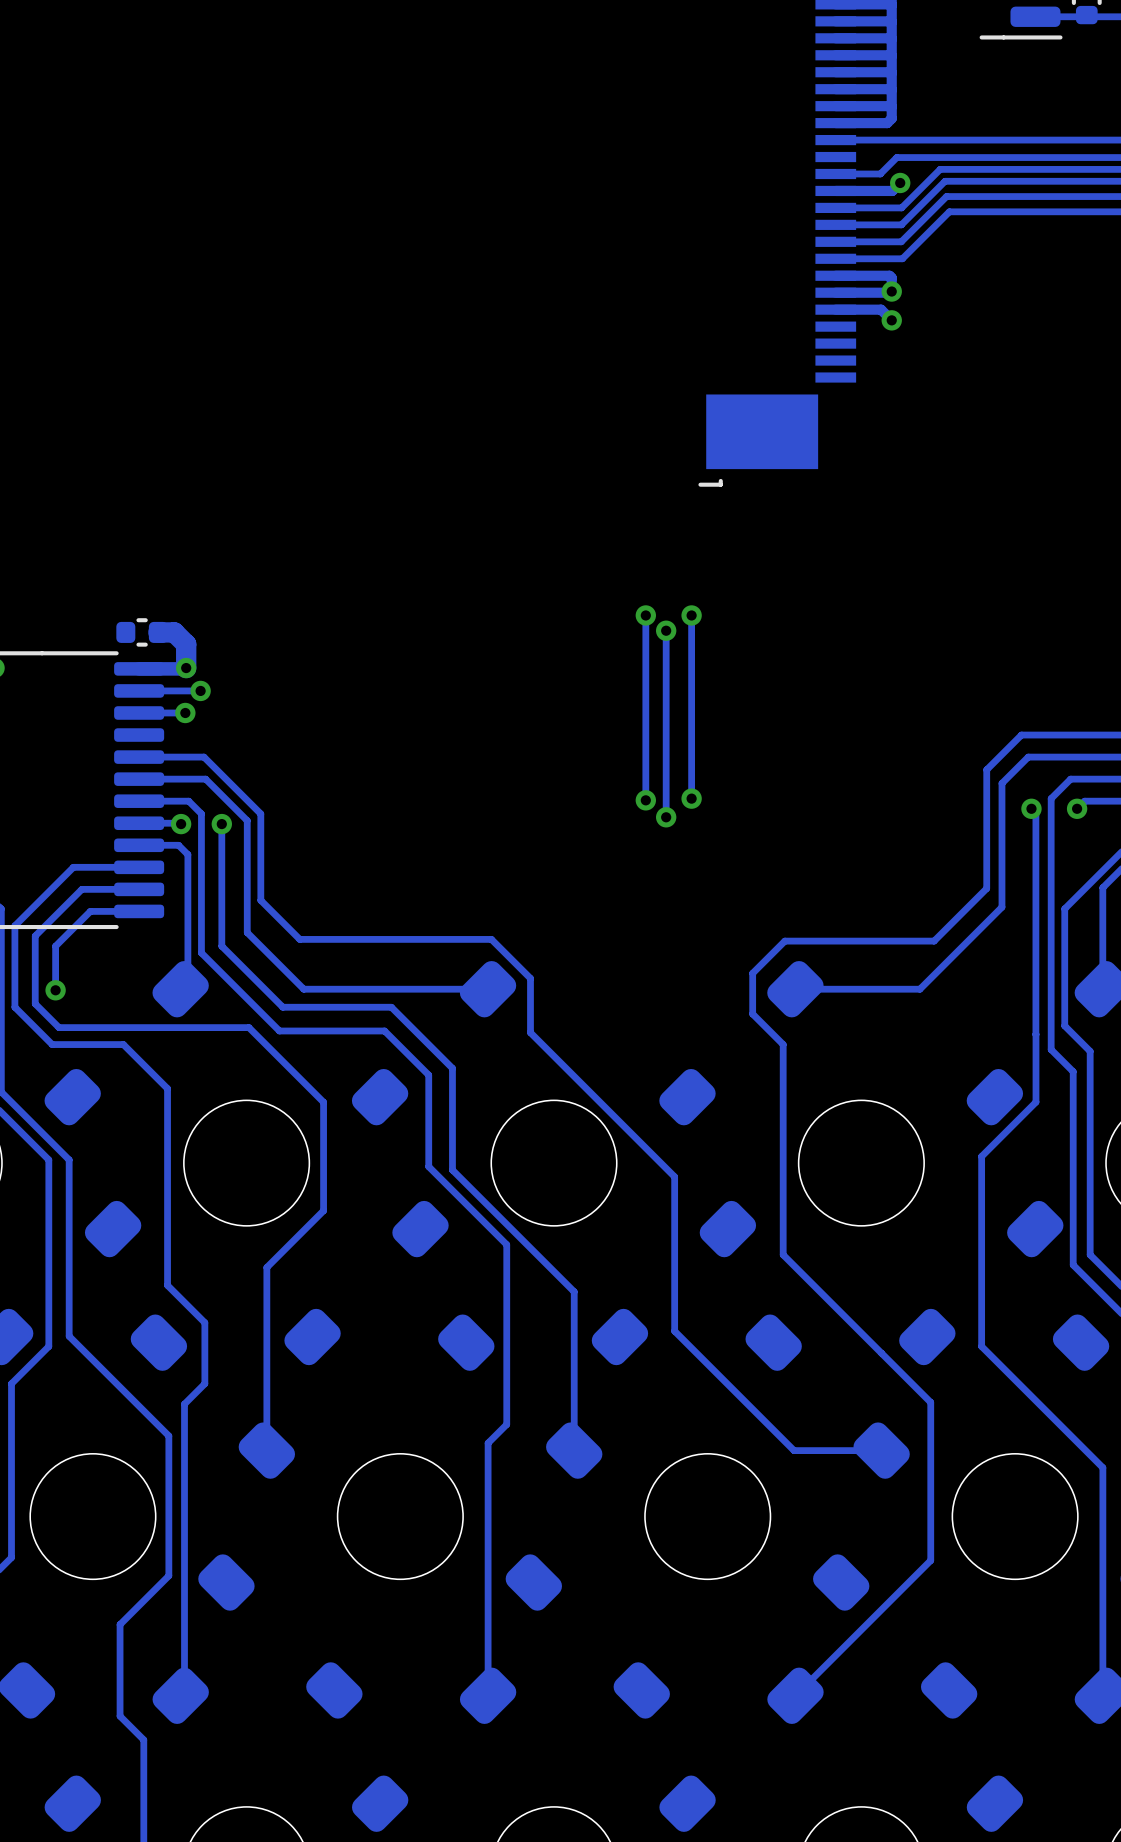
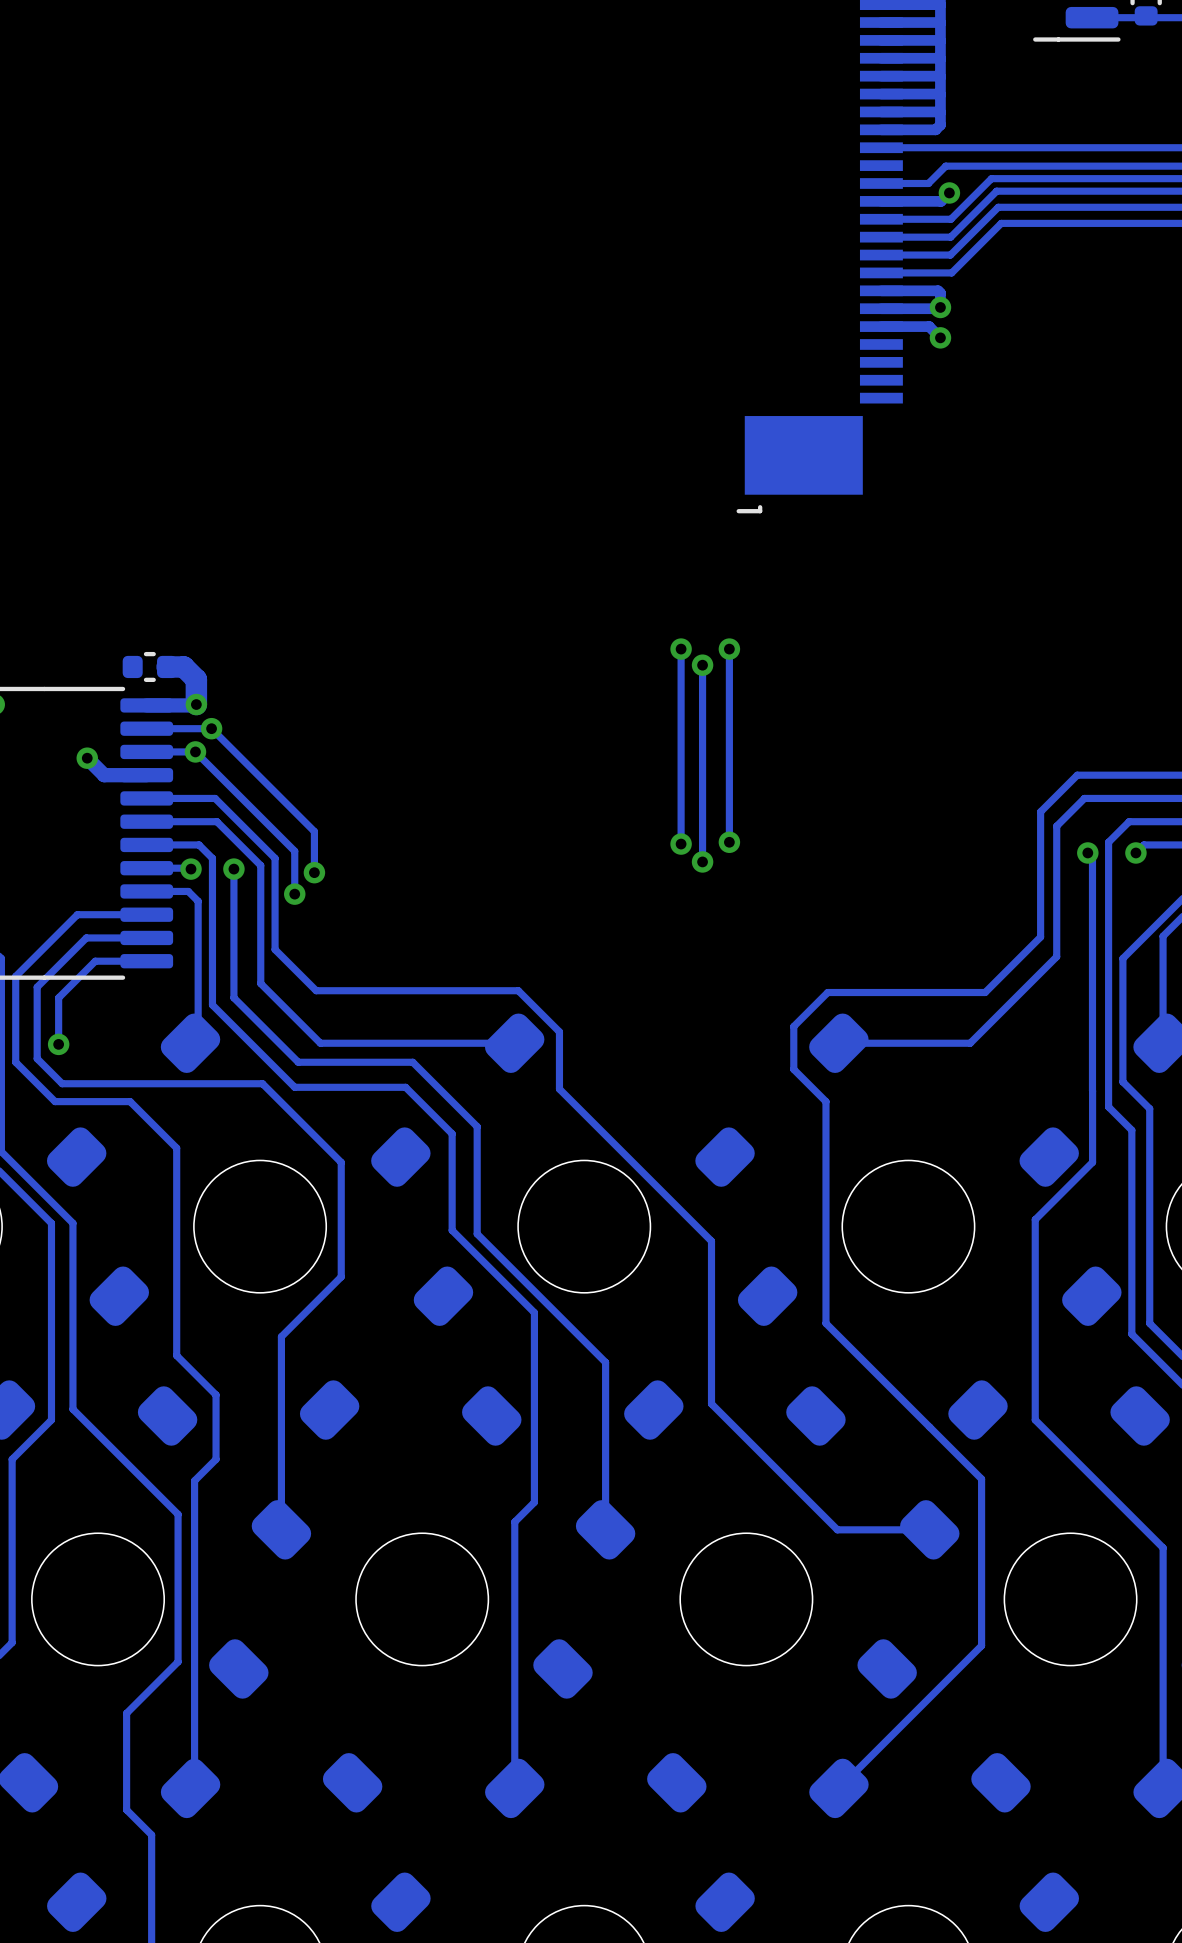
track: none -> (211, 728) (314, 831) (314, 872)
track: none -> (195, 751) (294, 851) (294, 894)
track: none -> (87, 758) (104, 775) (146, 775)
via: none -> (87, 758)
via: none -> (314, 872)
via: none -> (294, 894)

